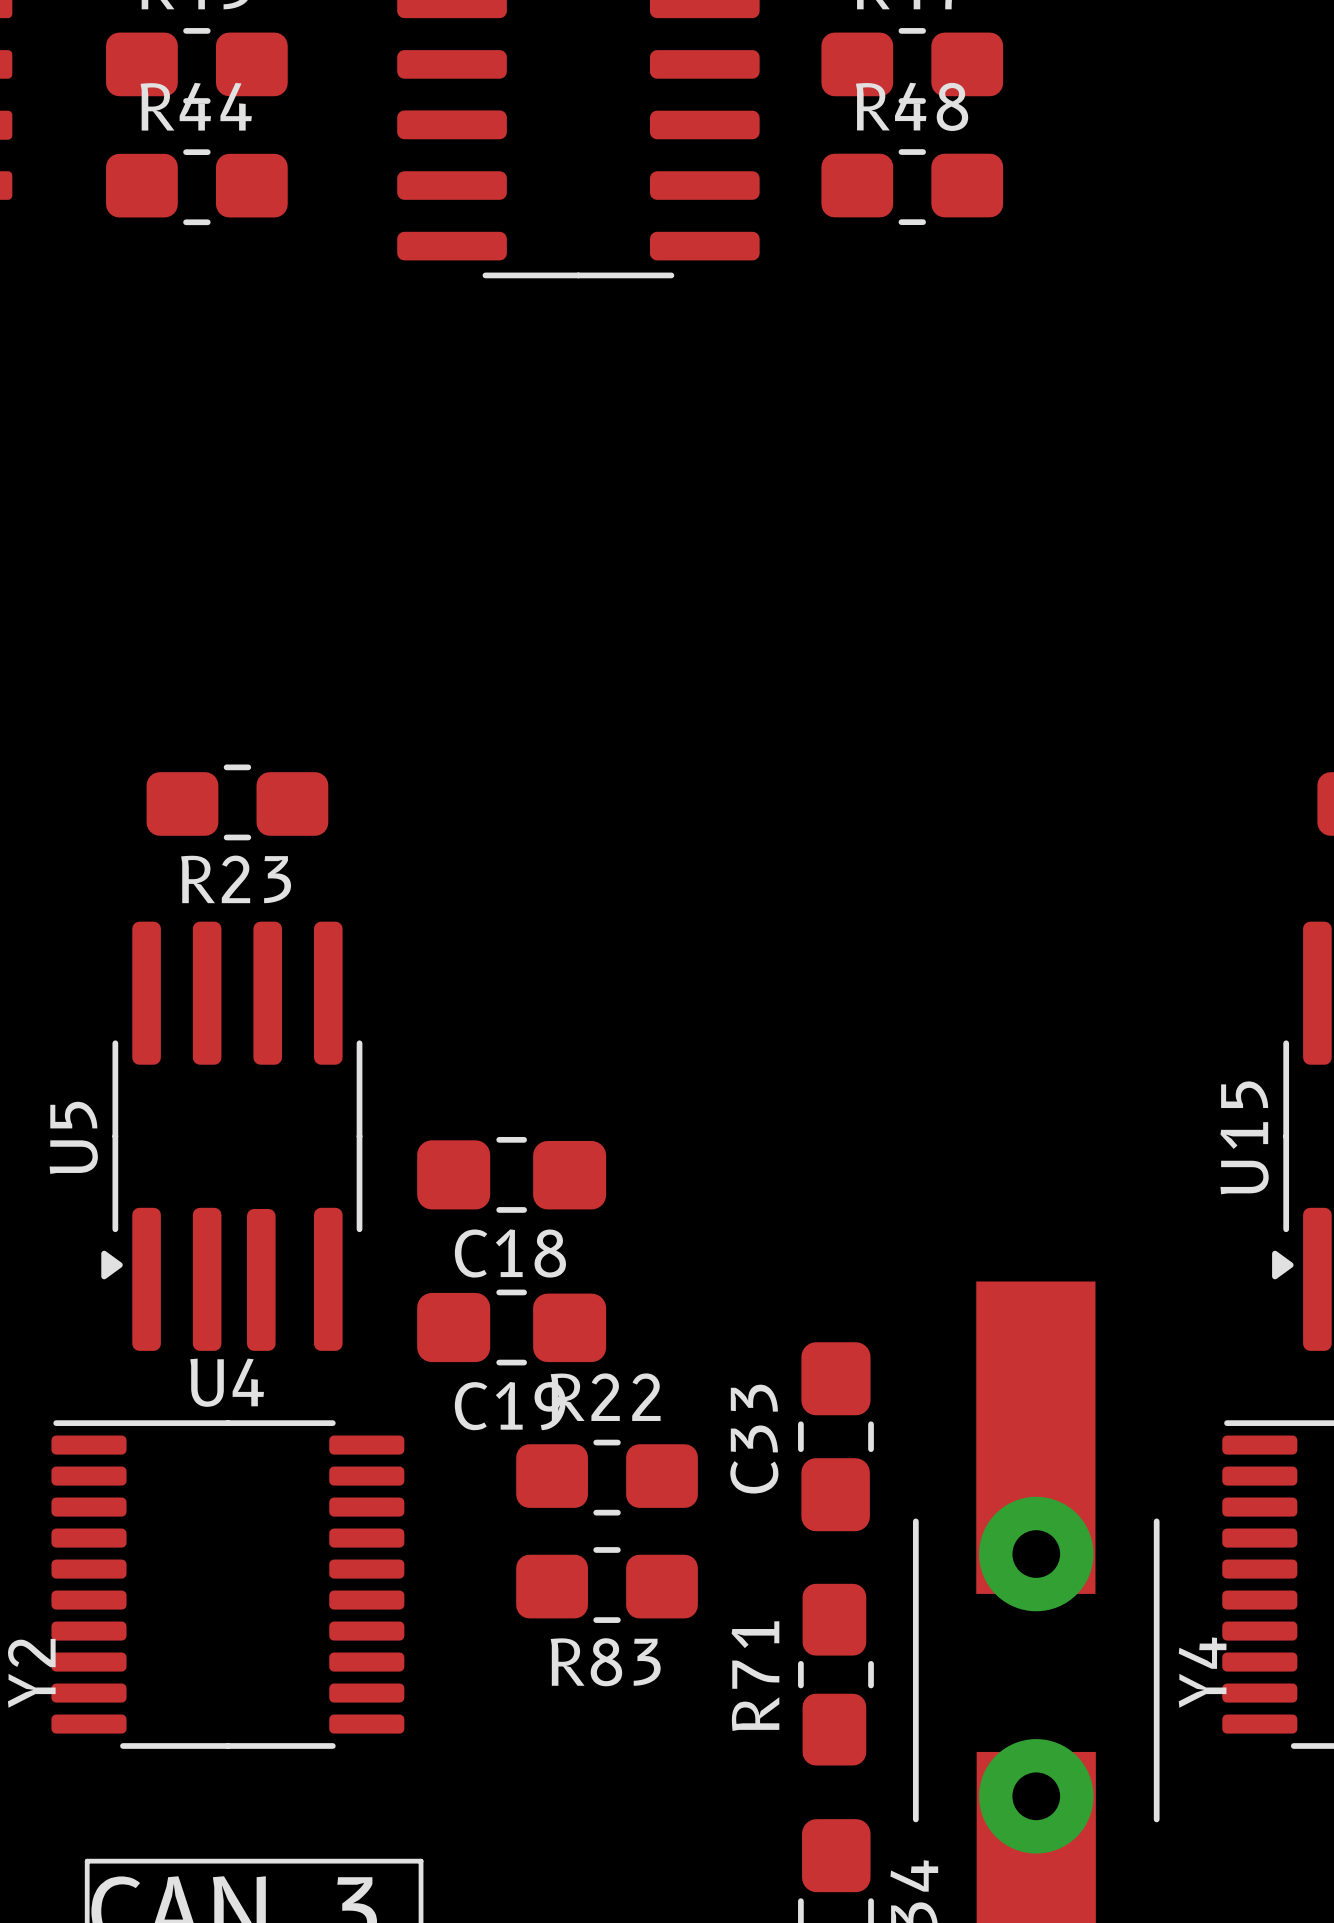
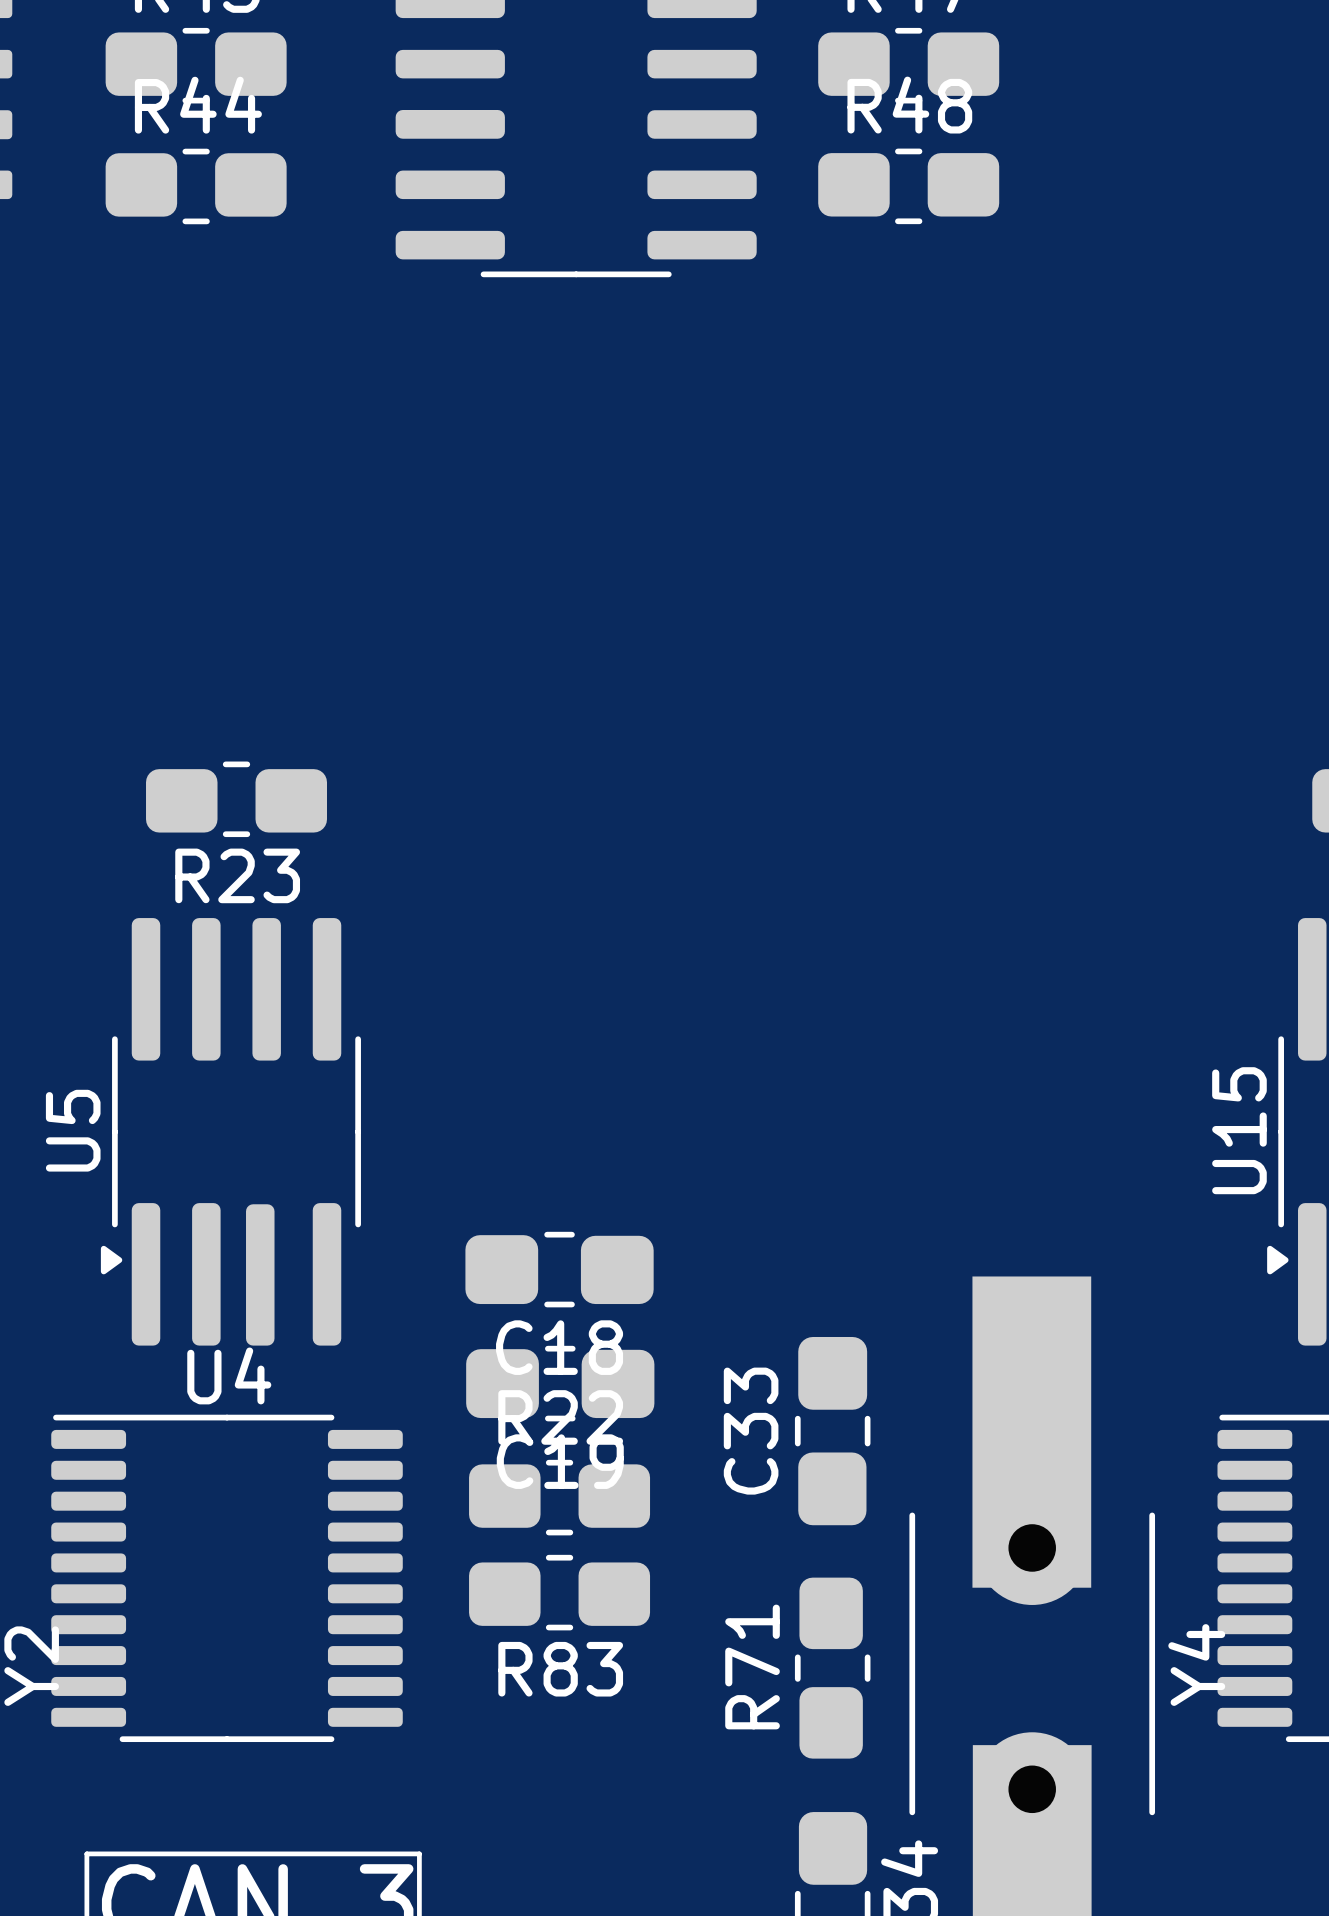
C18 position: (511, 1174) -> (559, 1269)
C19 position: (511, 1327) -> (560, 1383)
R22 position: (607, 1477) -> (559, 1497)
R83 position: (607, 1585) -> (559, 1592)

